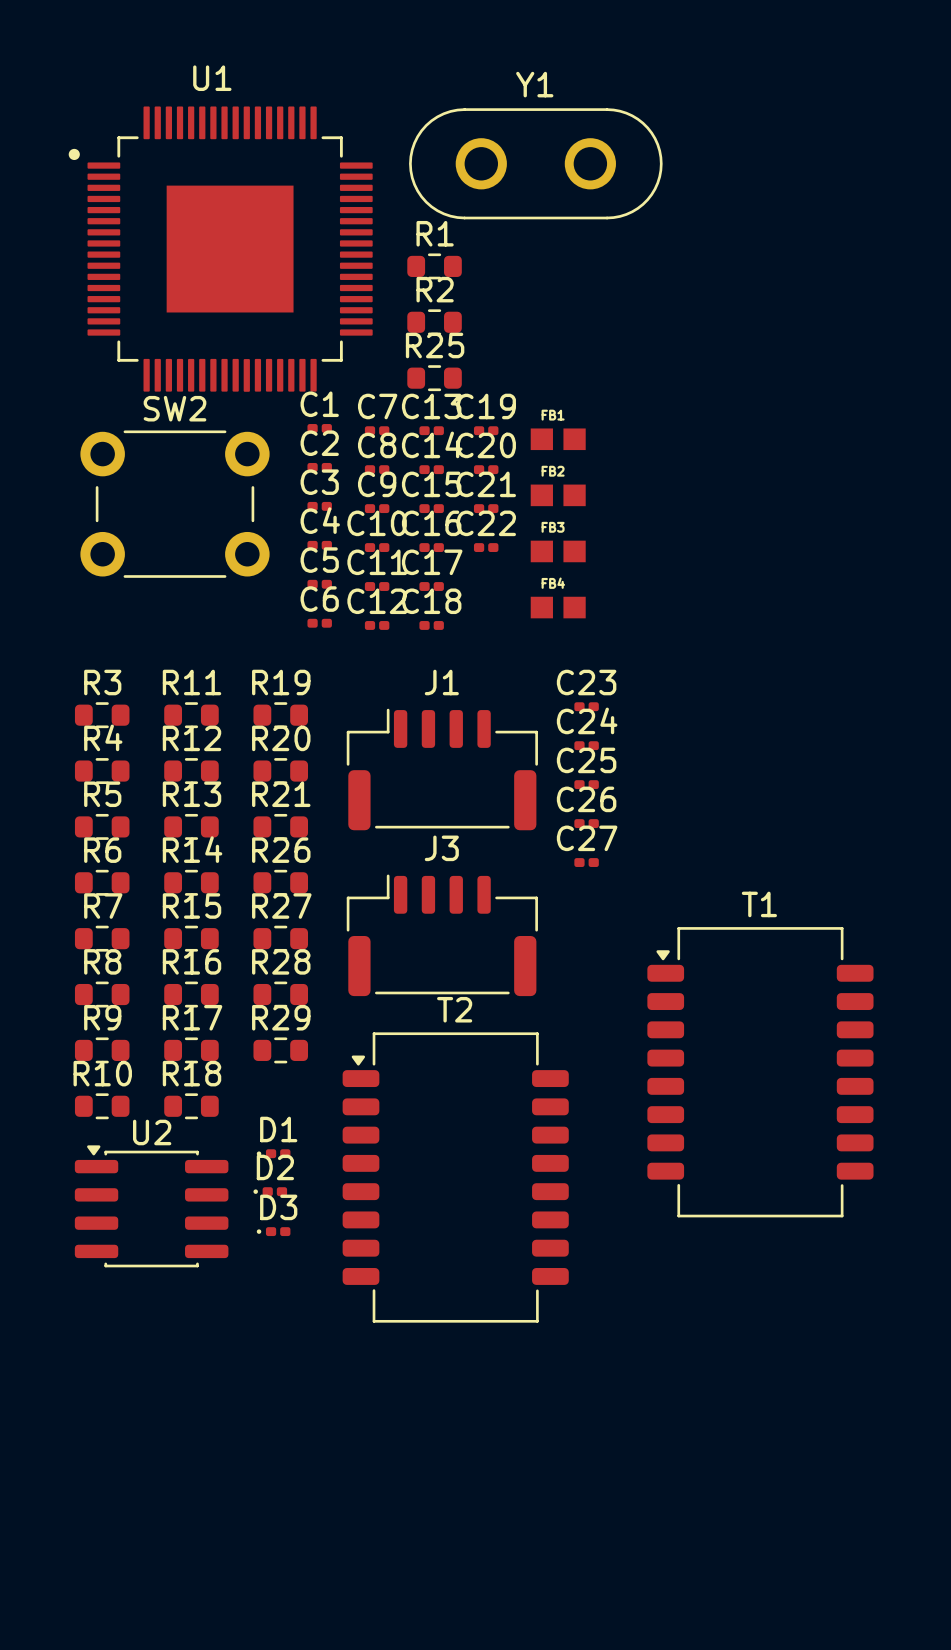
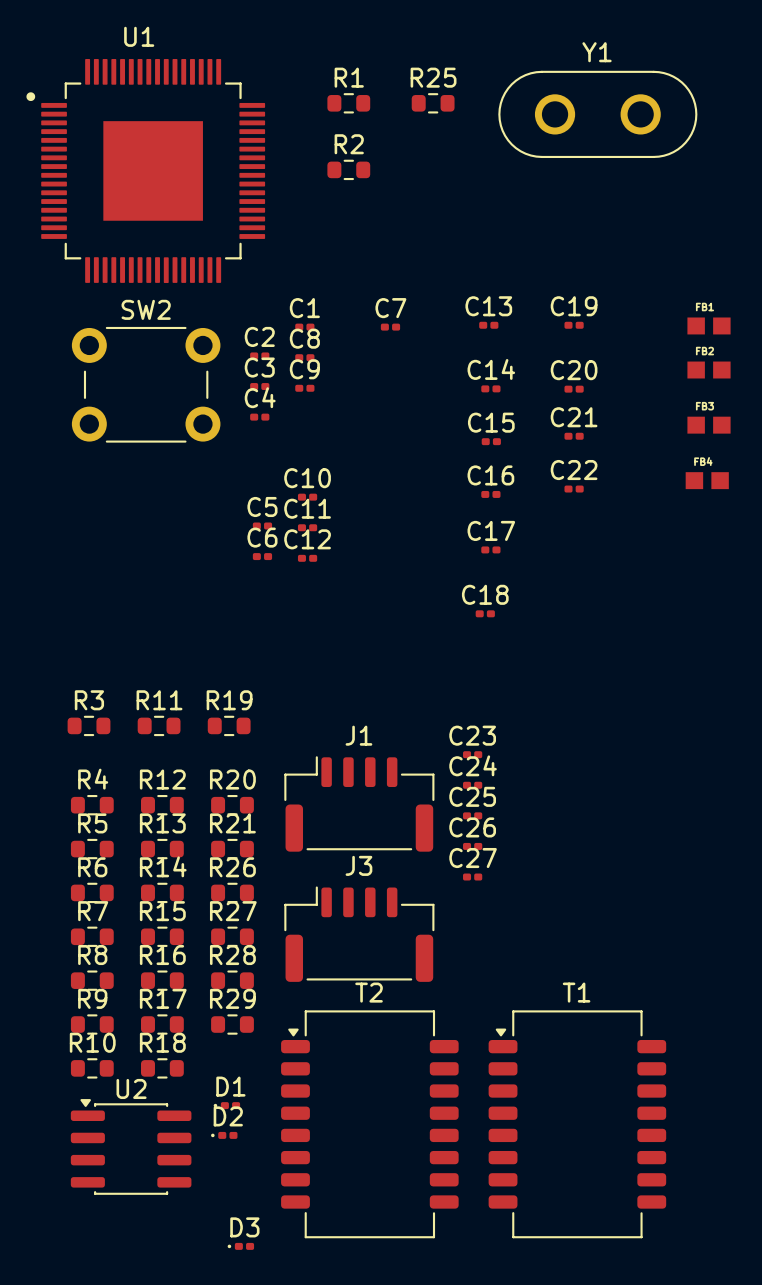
Y1 position: (535, 163) -> (597, 114)
U1 position: (220, 249) -> (145, 171)
R1 position: (434, 266) -> (348, 103)
R2 position: (434, 322) -> (348, 169)
R25 position: (434, 378) -> (433, 103)
C7 name: C7 (377, 406) -> C1 (304, 308)
C19 name: C19 (486, 406) -> C7 (390, 308)
C1: (319, 428) -> none
C19: none -> (574, 325)
C13 position: (431, 430) -> (488, 325)
FB1 position: (558, 439) -> (709, 325)
C14 position: (431, 469) -> (490, 388)
C20 position: (486, 469) -> (574, 389)
FB2 position: (558, 495) -> (709, 370)
C15 position: (431, 508) -> (491, 441)
C21 position: (486, 508) -> (574, 436)
C10 position: (377, 547) -> (307, 497)
C16 position: (431, 547) -> (490, 494)
C22 position: (486, 547) -> (574, 489)
FB3 position: (558, 551) -> (709, 425)
C5 position: (319, 584) -> (262, 525)
C11 position: (377, 586) -> (307, 527)
C17 position: (431, 586) -> (490, 549)
FB4 position: (558, 607) -> (707, 480)
C6 position: (319, 623) -> (262, 556)
C12 position: (377, 625) -> (307, 558)
C18 position: (431, 625) -> (485, 613)
C23 position: (586, 706) -> (472, 754)
R3: (102, 715) -> none
R11: (191, 715) -> none
R19: (280, 715) -> none
C24 position: (586, 745) -> (472, 785)
J1 position: (442, 769) -> (359, 803)
R4 position: (102, 771) -> (92, 805)
R12 position: (191, 771) -> (162, 805)
R20 position: (280, 771) -> (232, 805)
C25 position: (586, 784) -> (472, 815)
C26 position: (586, 823) -> (472, 846)
R5 position: (102, 826) -> (92, 849)
R13 position: (191, 826) -> (162, 849)
R21 position: (280, 826) -> (232, 849)
C27 position: (586, 862) -> (472, 877)
R6 position: (102, 882) -> (92, 892)
R14 position: (191, 882) -> (162, 892)
R26 position: (280, 882) -> (232, 892)
R7 name: R7 (103, 906) -> R3 (89, 700)
R15 name: R15 (192, 906) -> R11 (159, 700)
R27 name: R27 (281, 906) -> R19 (229, 700)
J3 position: (442, 935) -> (359, 934)
R8 position: (102, 994) -> (92, 980)
R16 position: (191, 994) -> (162, 980)
R28 position: (280, 994) -> (232, 980)
R9 position: (102, 1050) -> (92, 1024)
R17 position: (191, 1050) -> (162, 1024)
R29 position: (280, 1050) -> (232, 1024)
T1 position: (760, 1072) -> (577, 1124)
R10 position: (102, 1106) -> (92, 1068)
R18 position: (191, 1106) -> (162, 1068)
D1 position: (273, 1153) -> (226, 1105)
T2 position: (455, 1177) -> (369, 1124)
D2 position: (270, 1191) -> (224, 1135)
U2 position: (151, 1206) -> (131, 1146)
R7: none -> (92, 936)
R15: none -> (162, 936)
R27: none -> (232, 936)
D3 position: (273, 1231) -> (240, 1246)

